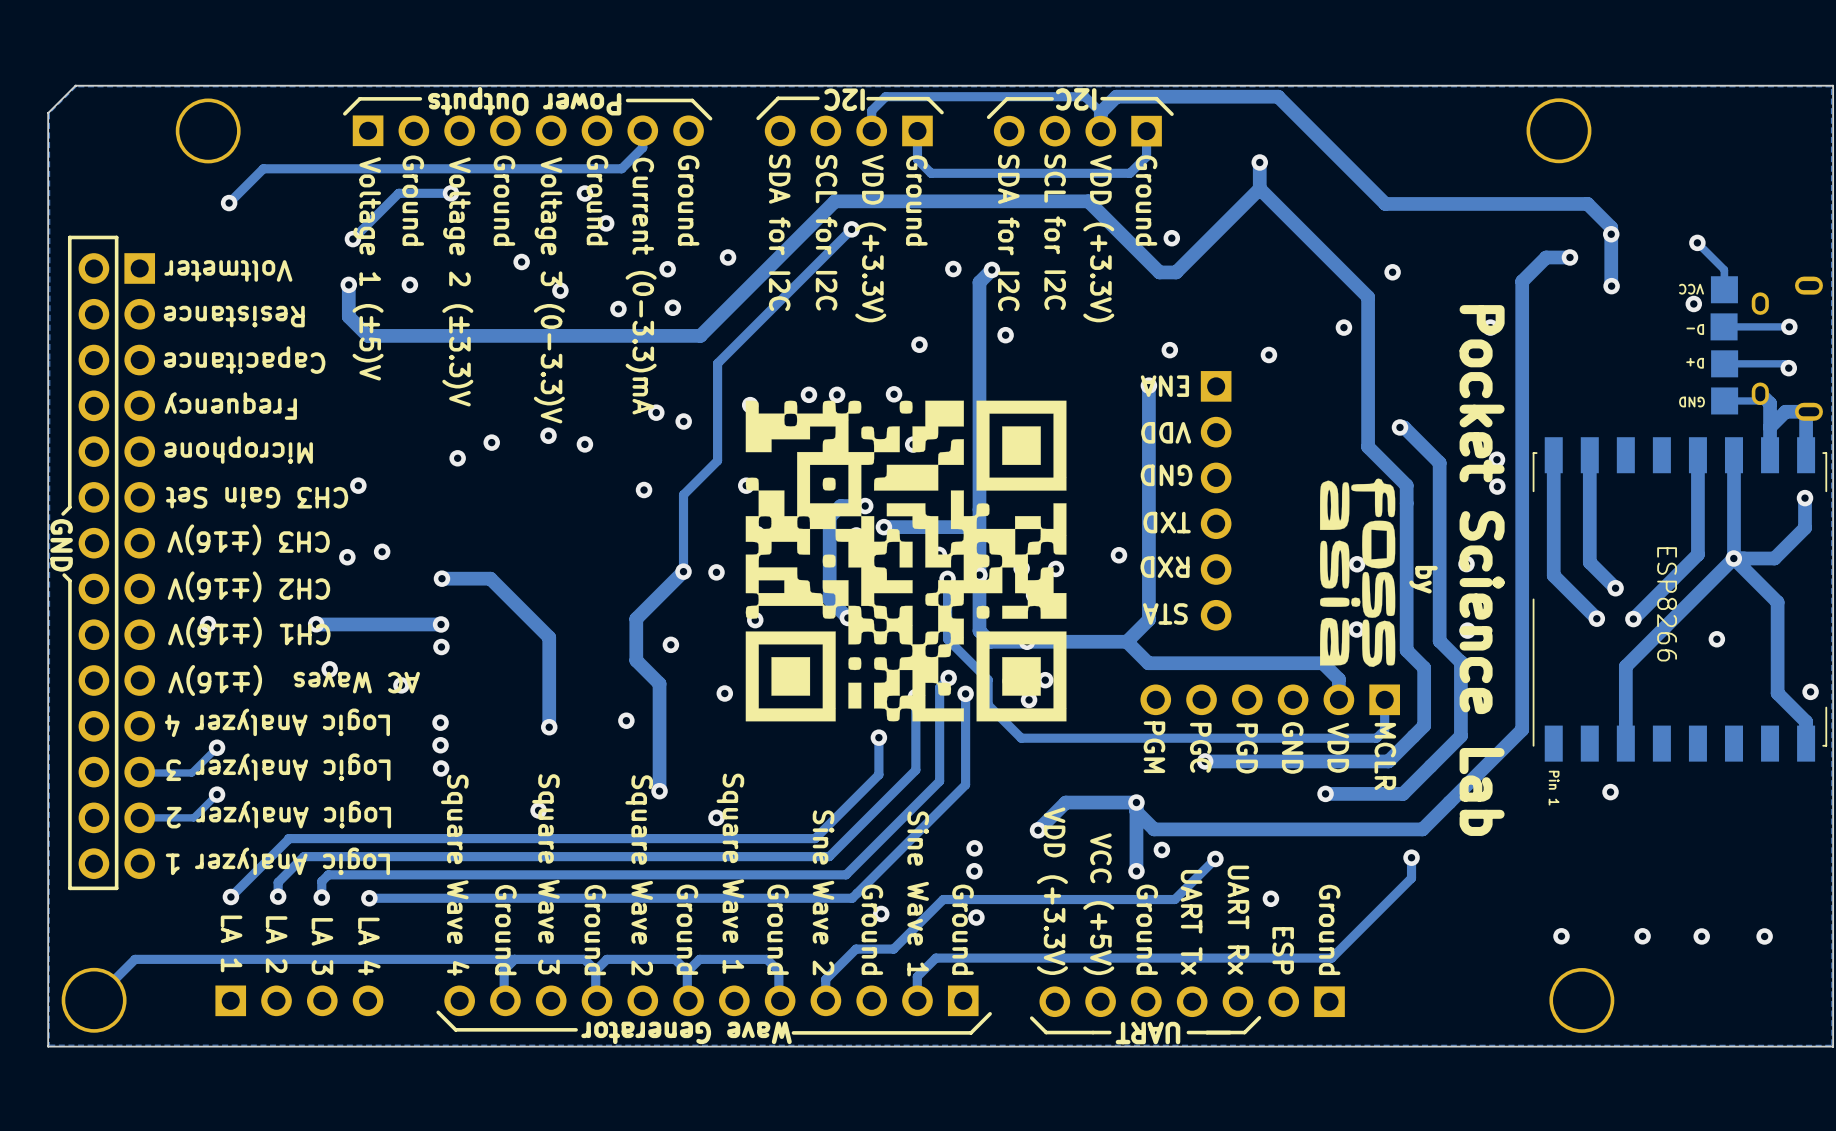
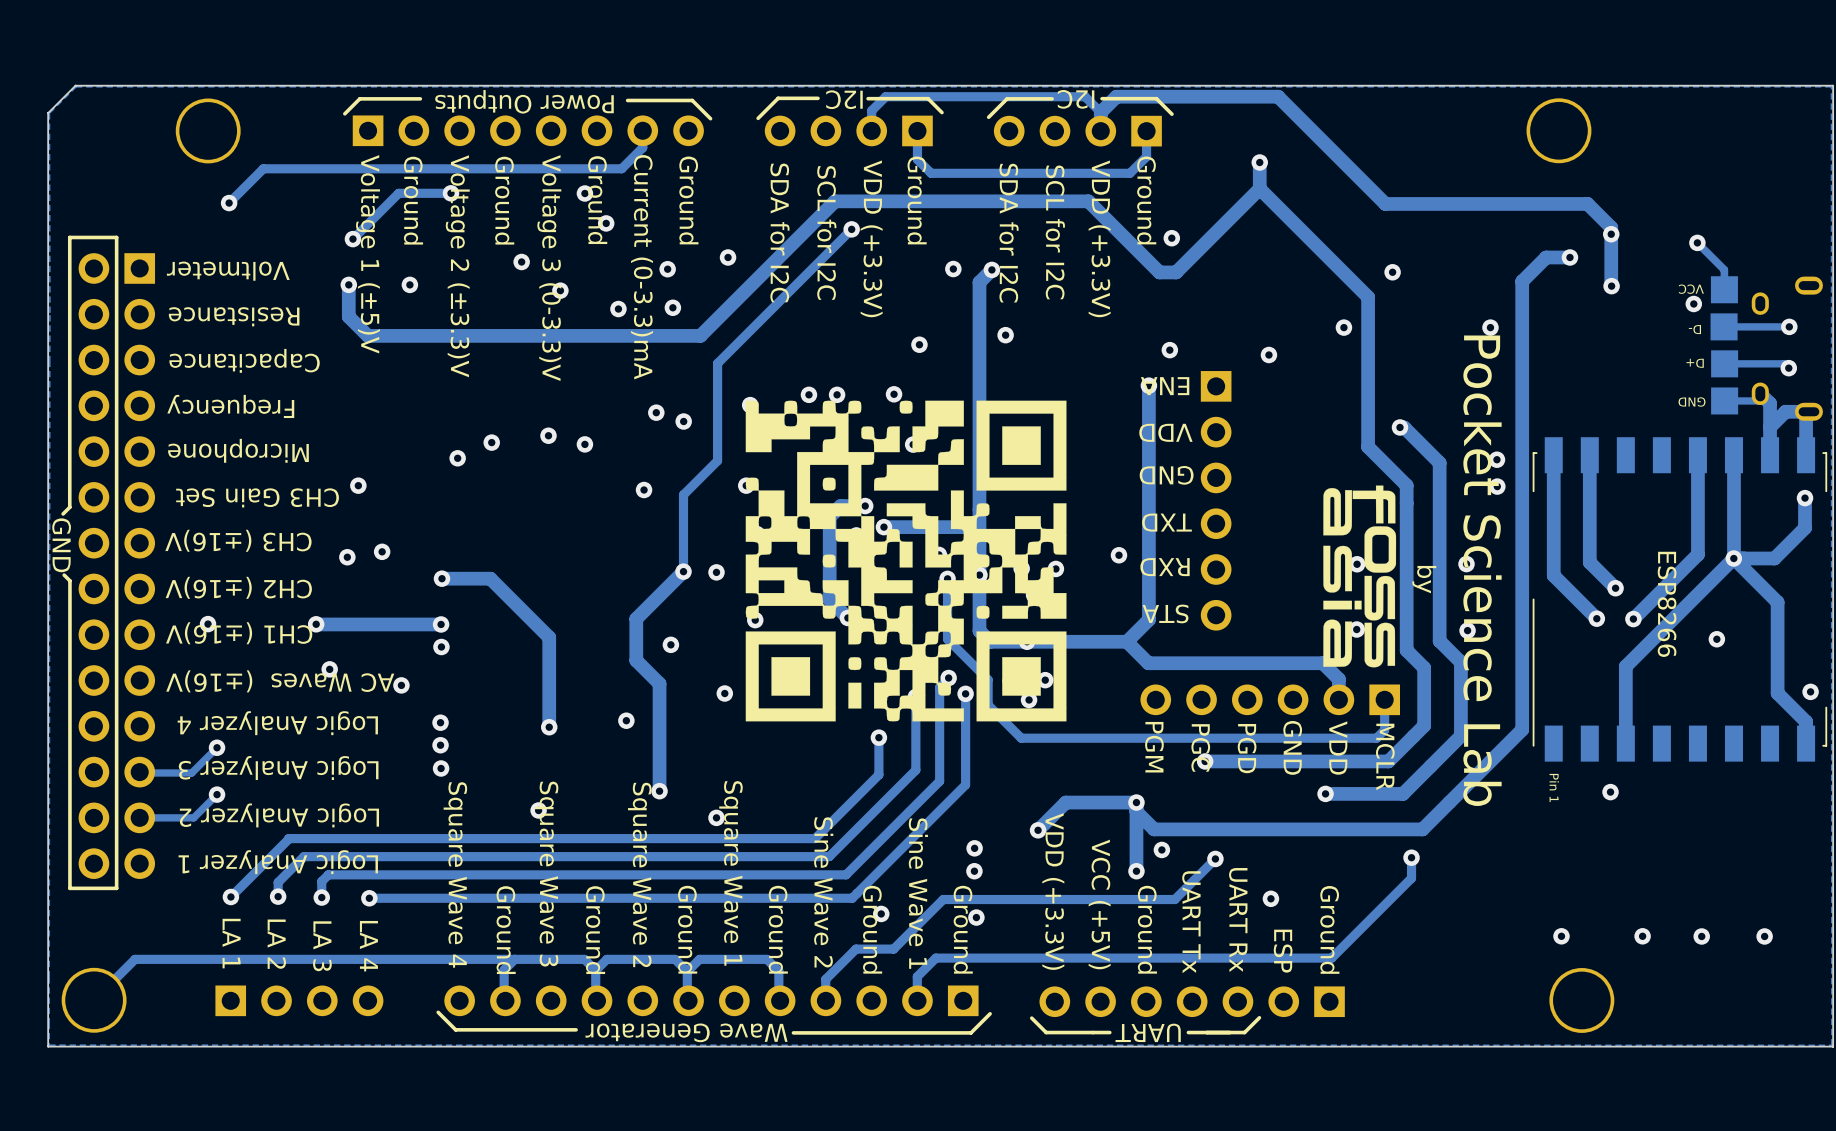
drawing shape: [1319, 478, 1396, 667] -> [1323, 485, 1397, 668]

